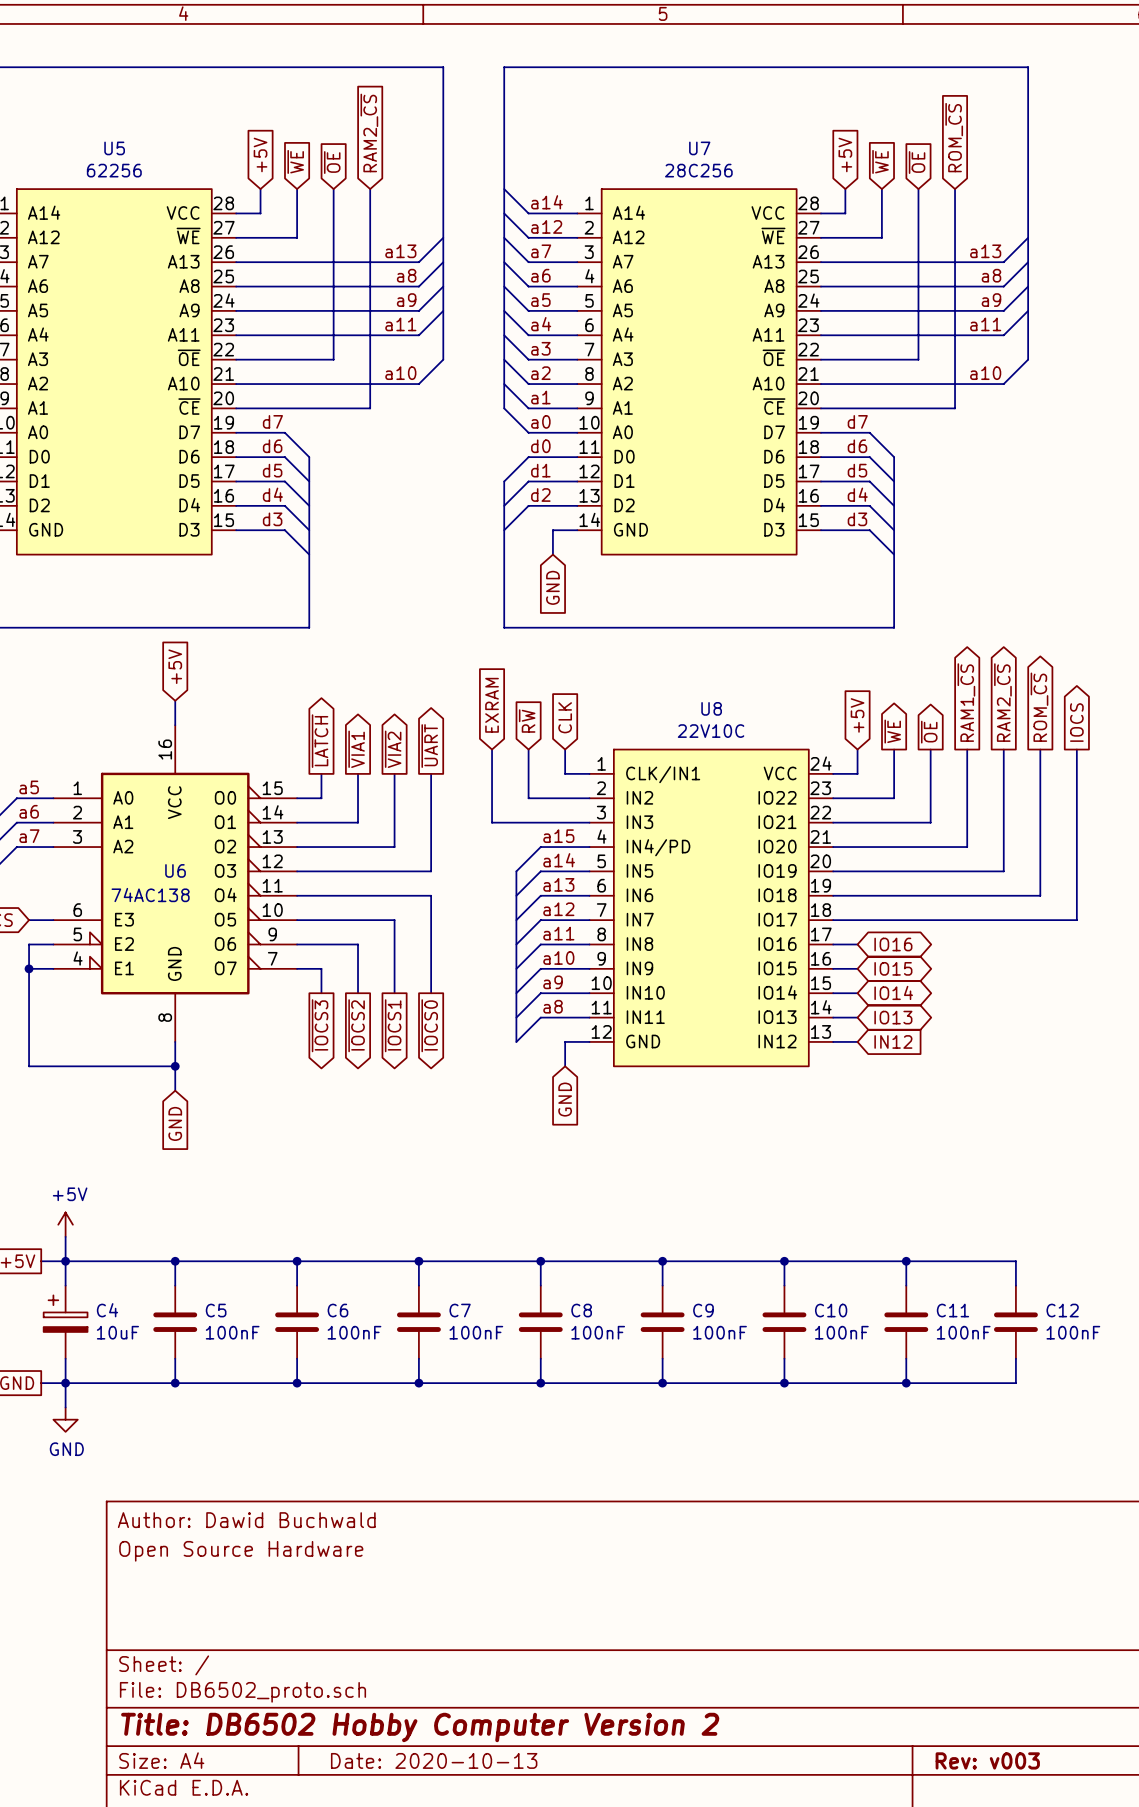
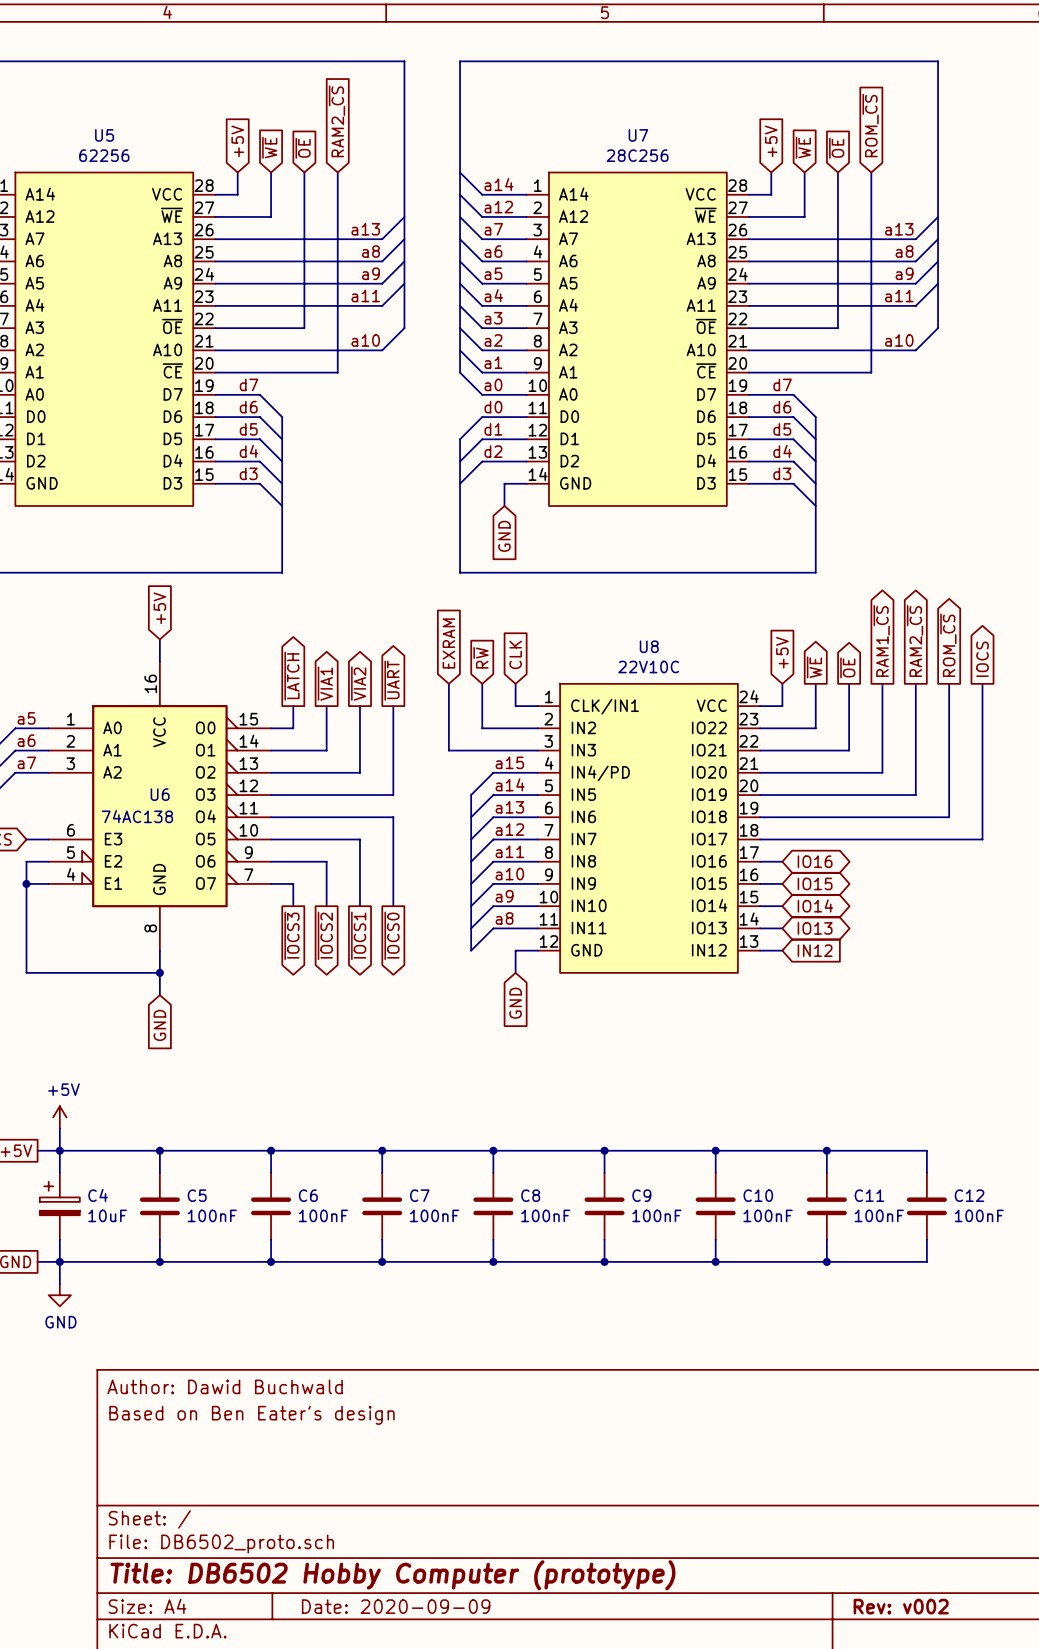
title block: Open Source Hardware (241, 1551) -> Based on Ben Eater's design (252, 1415)
title block: Title: DB6502 Hobby Computer Version 2 (420, 1727) -> Title: DB6502 Hobby Computer (prototype) (393, 1575)
title block: Date: 2020-10-13 (434, 1760) -> Date: 2020-09-09 (396, 1606)
title block: Rev: v003 (987, 1760) -> Rev: v002 (901, 1606)

